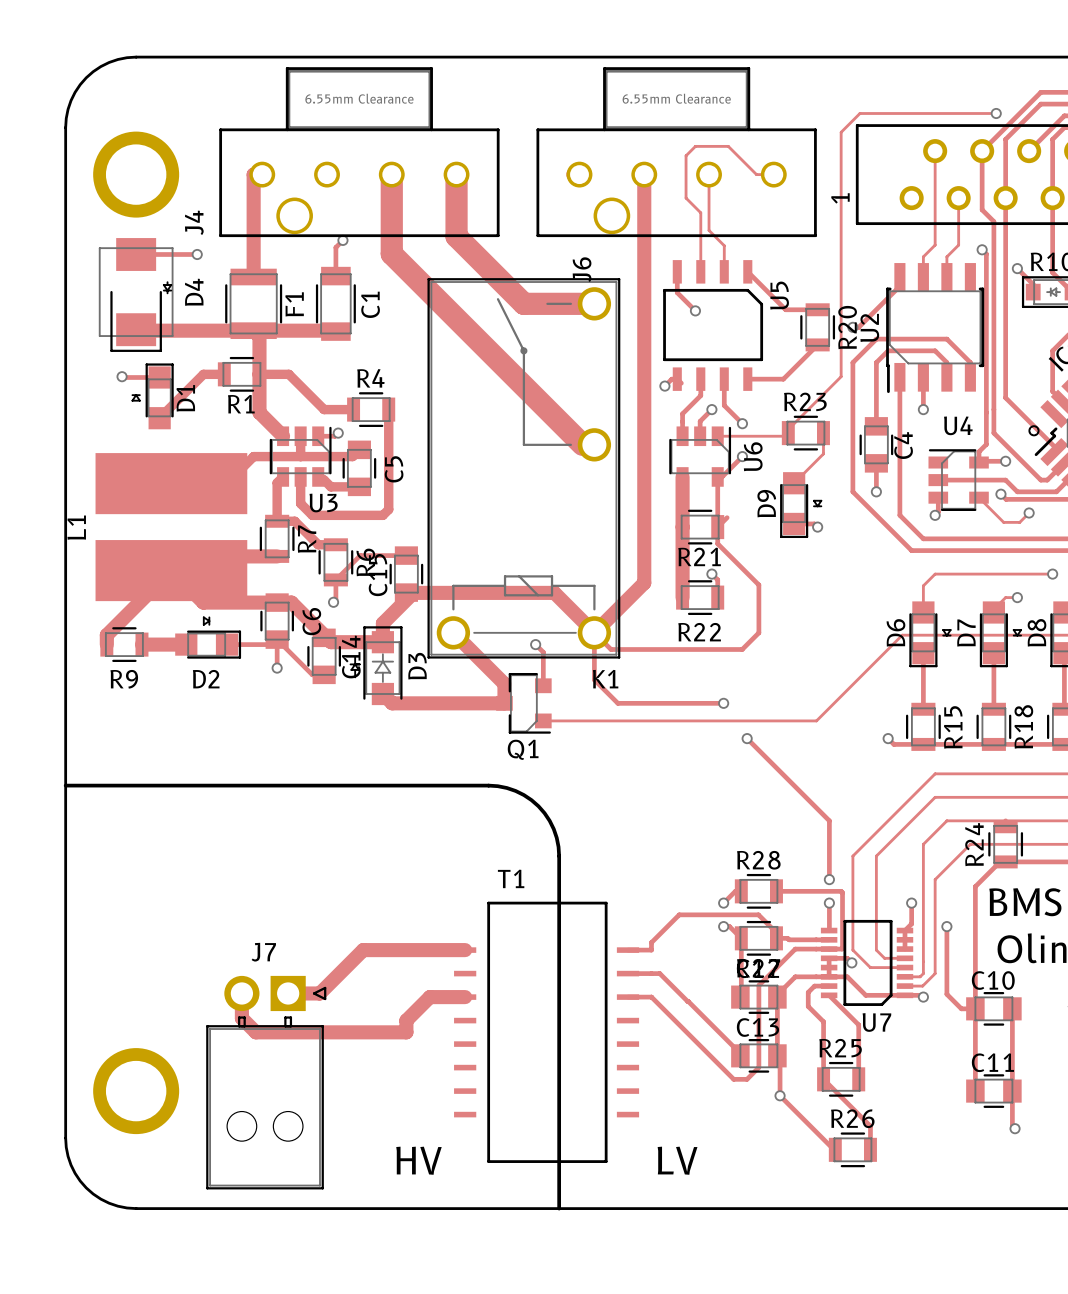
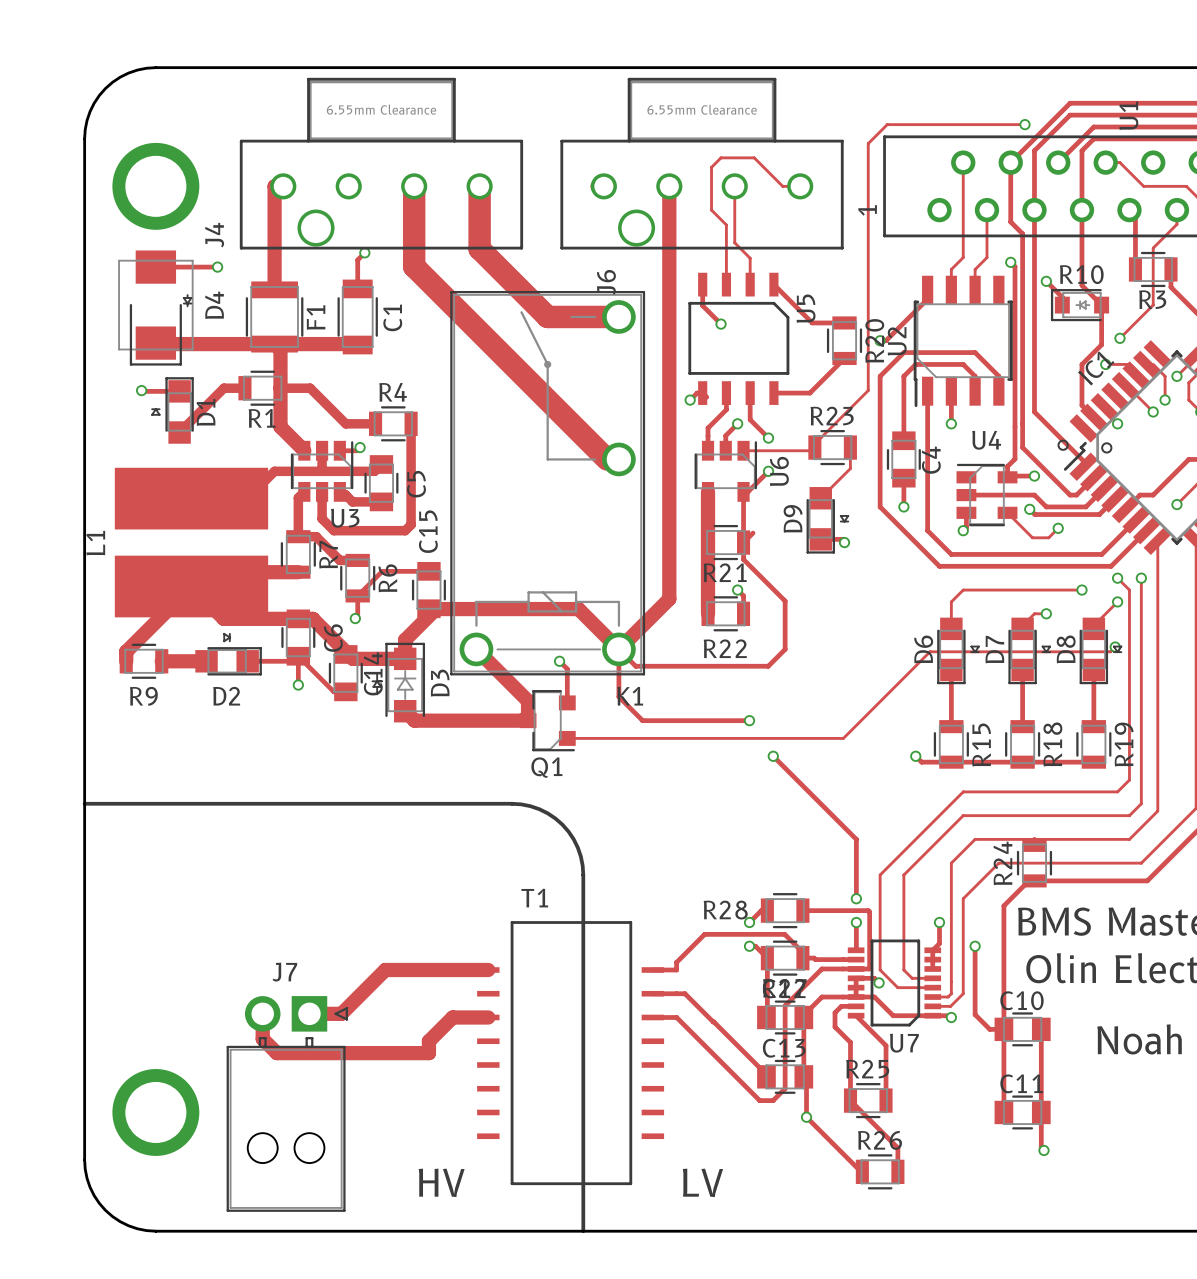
C15 name position: C15 (378, 575) -> C15 (428, 531)
R28 name position: R28 (758, 860) -> R28 (725, 910)

